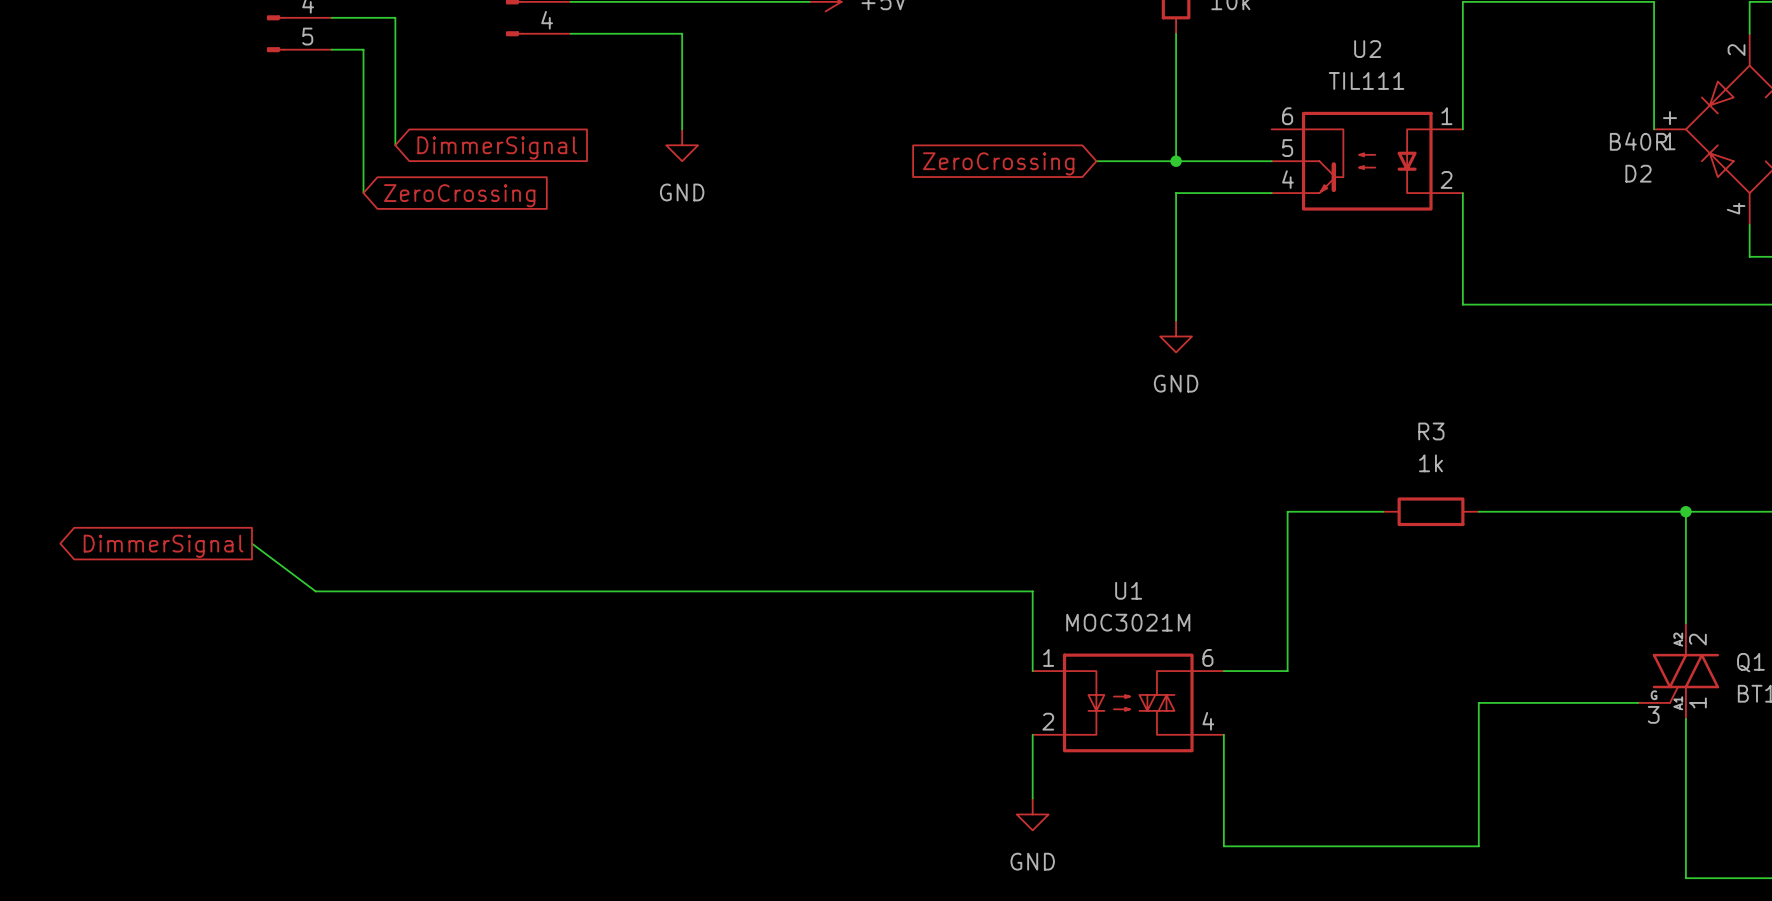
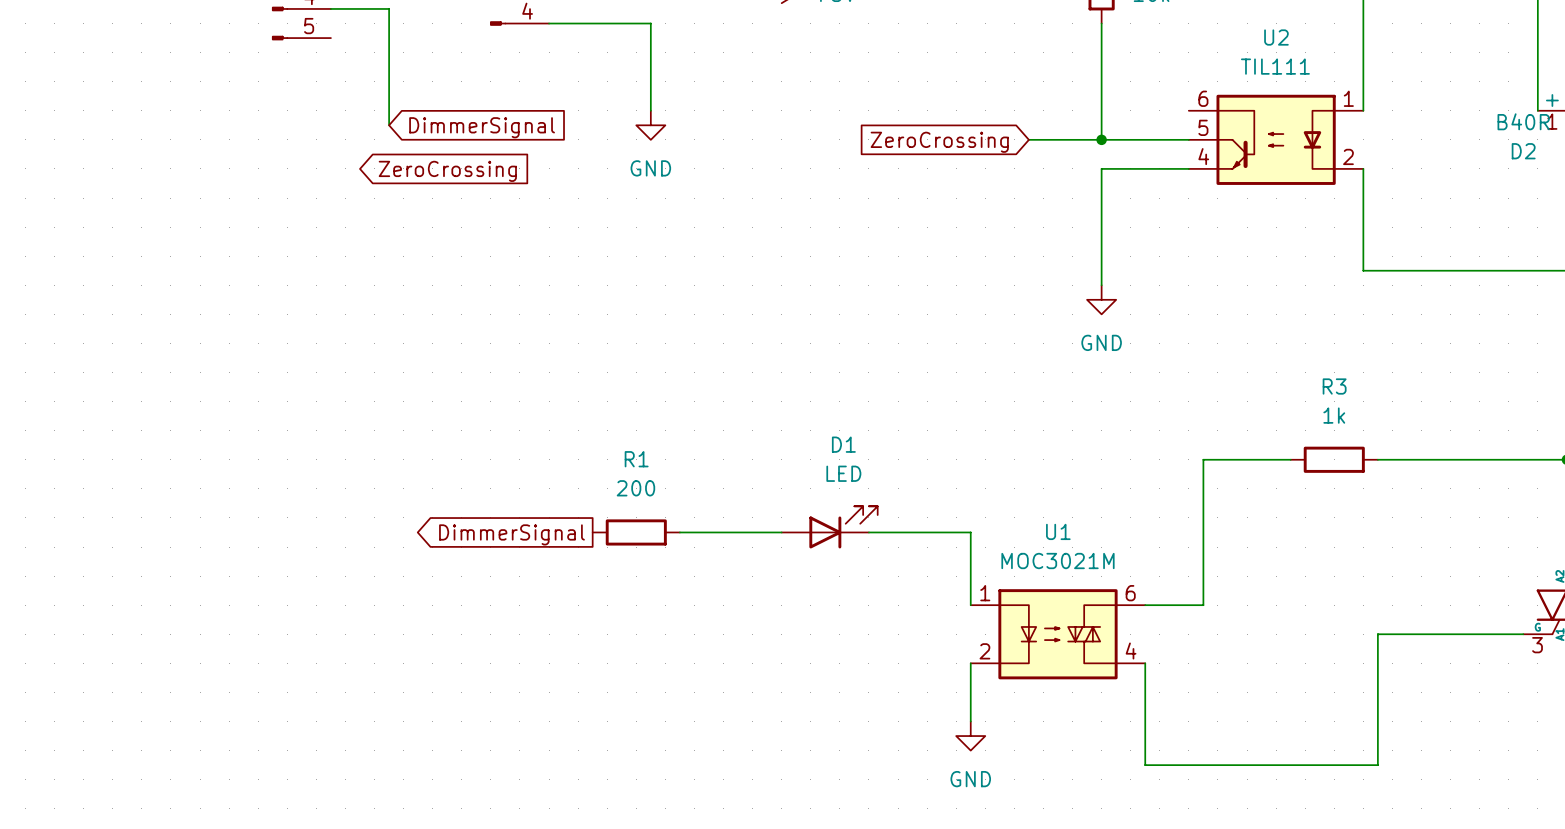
wire: (331, 49) (363, 49) (363, 193) -> none
wire: (251, 543) (315, 591) (714, 591) -> none
global label: DimmerSignal (163, 546) -> none
D1: none -> LED (829, 527)
R1: none -> 200 (636, 532)
global label: none -> DimmerSignal (511, 534)

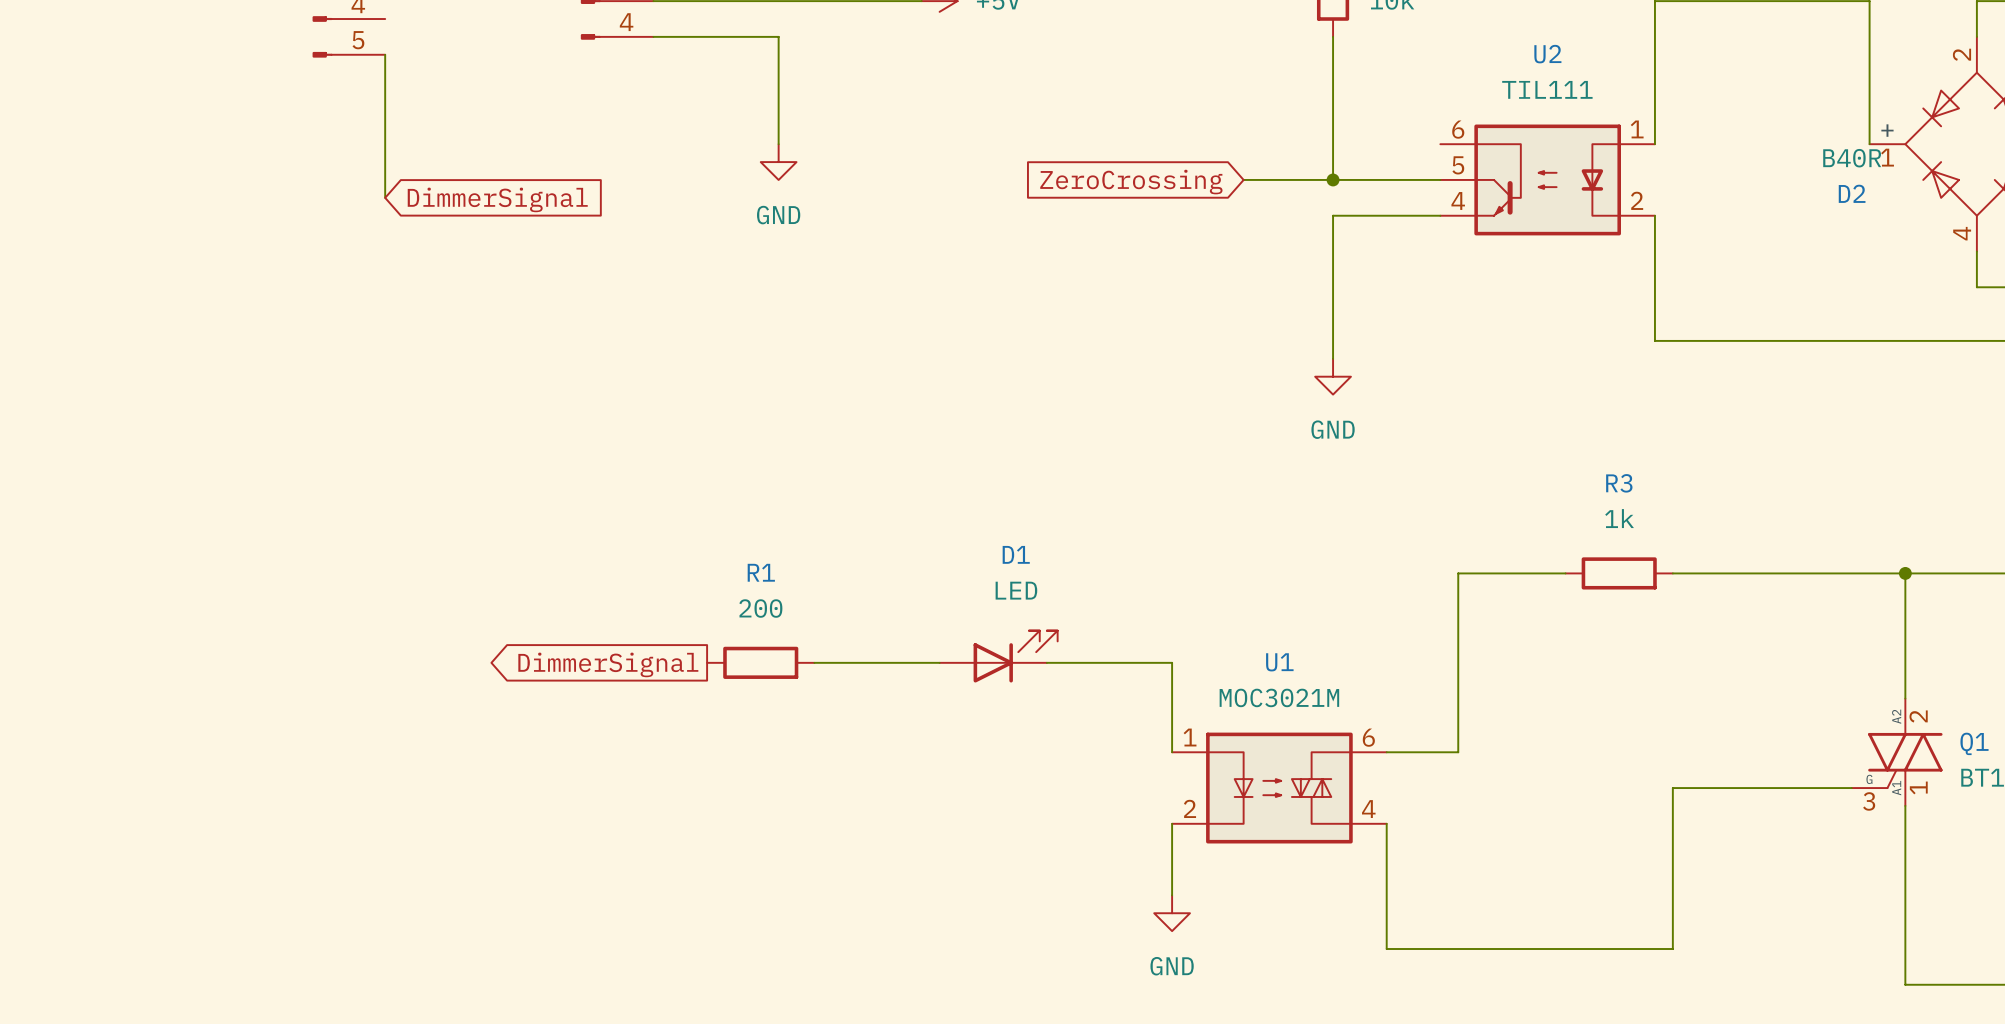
wire: (330, 8) (389, 8) (389, 125) -> none
wire: none -> (385, 54) (385, 197)
global label position: DimmerSignal (482, 127) -> DimmerSignal (497, 199)
global label: ZeroCrossing (447, 171) -> none

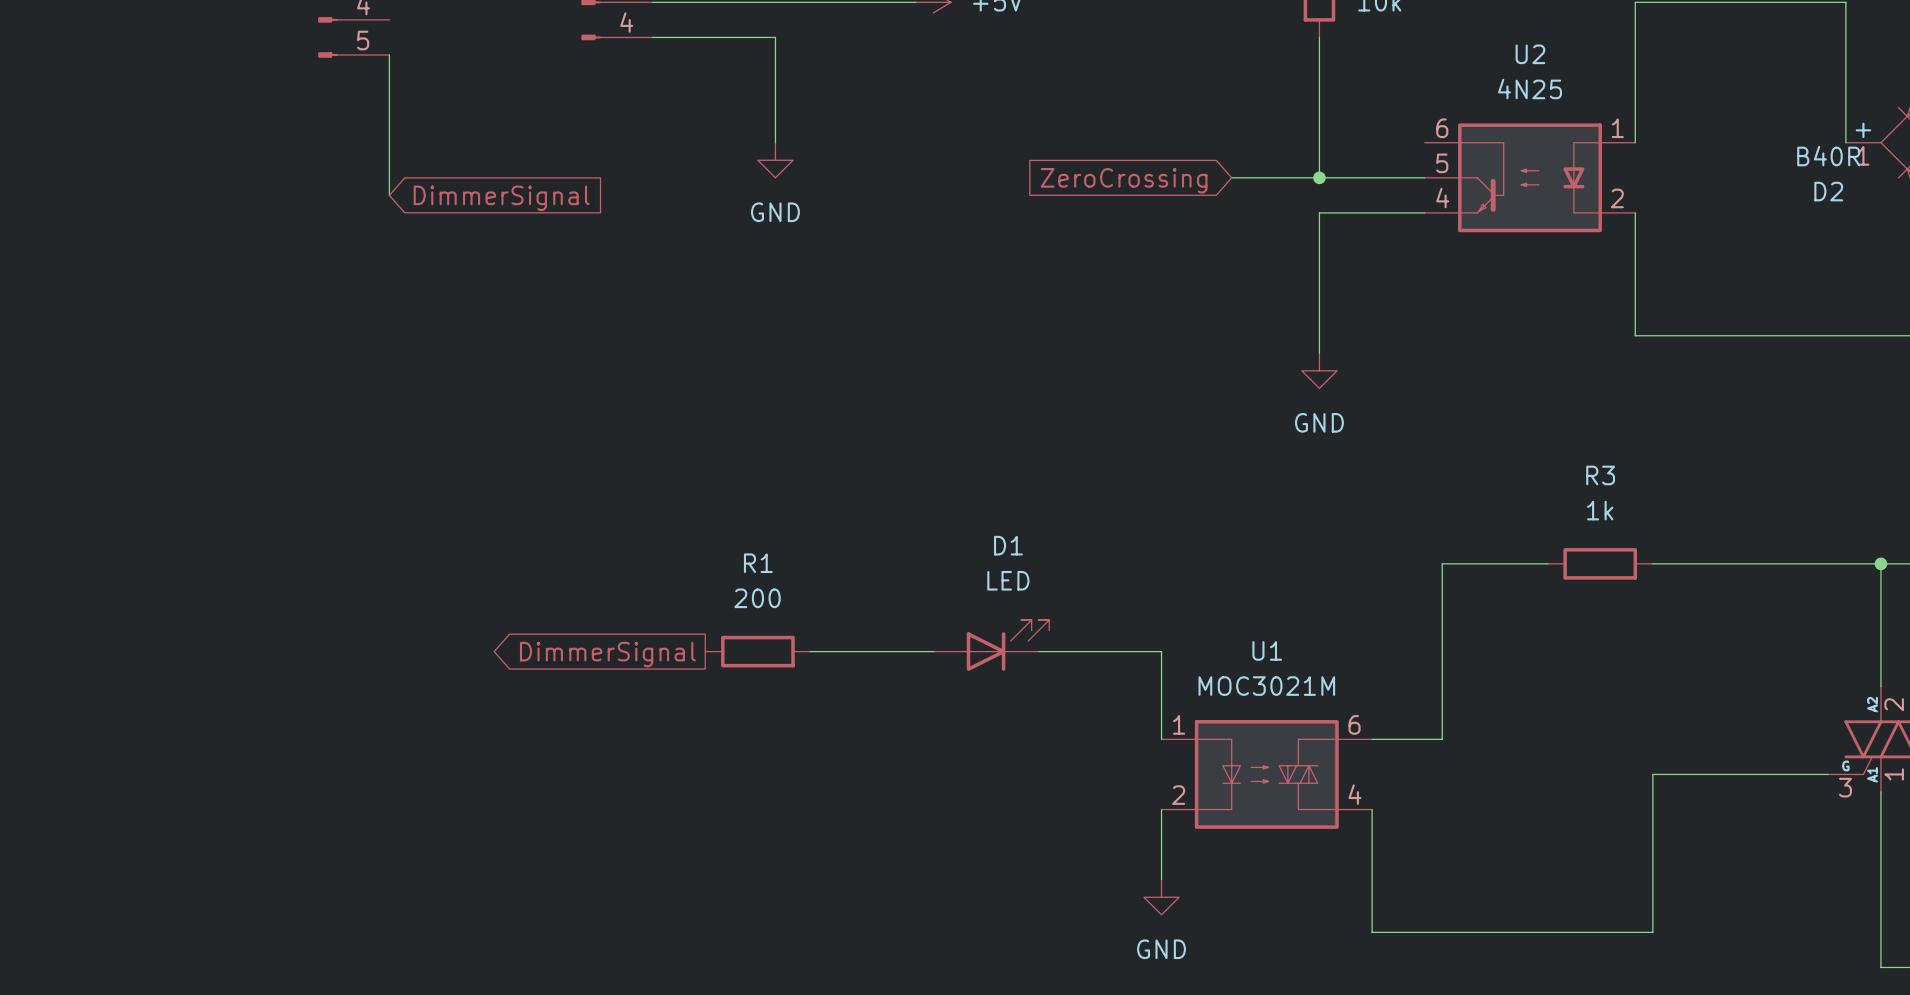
U2 value: TIL111 (1547, 89) -> 4N25 (1530, 89)

